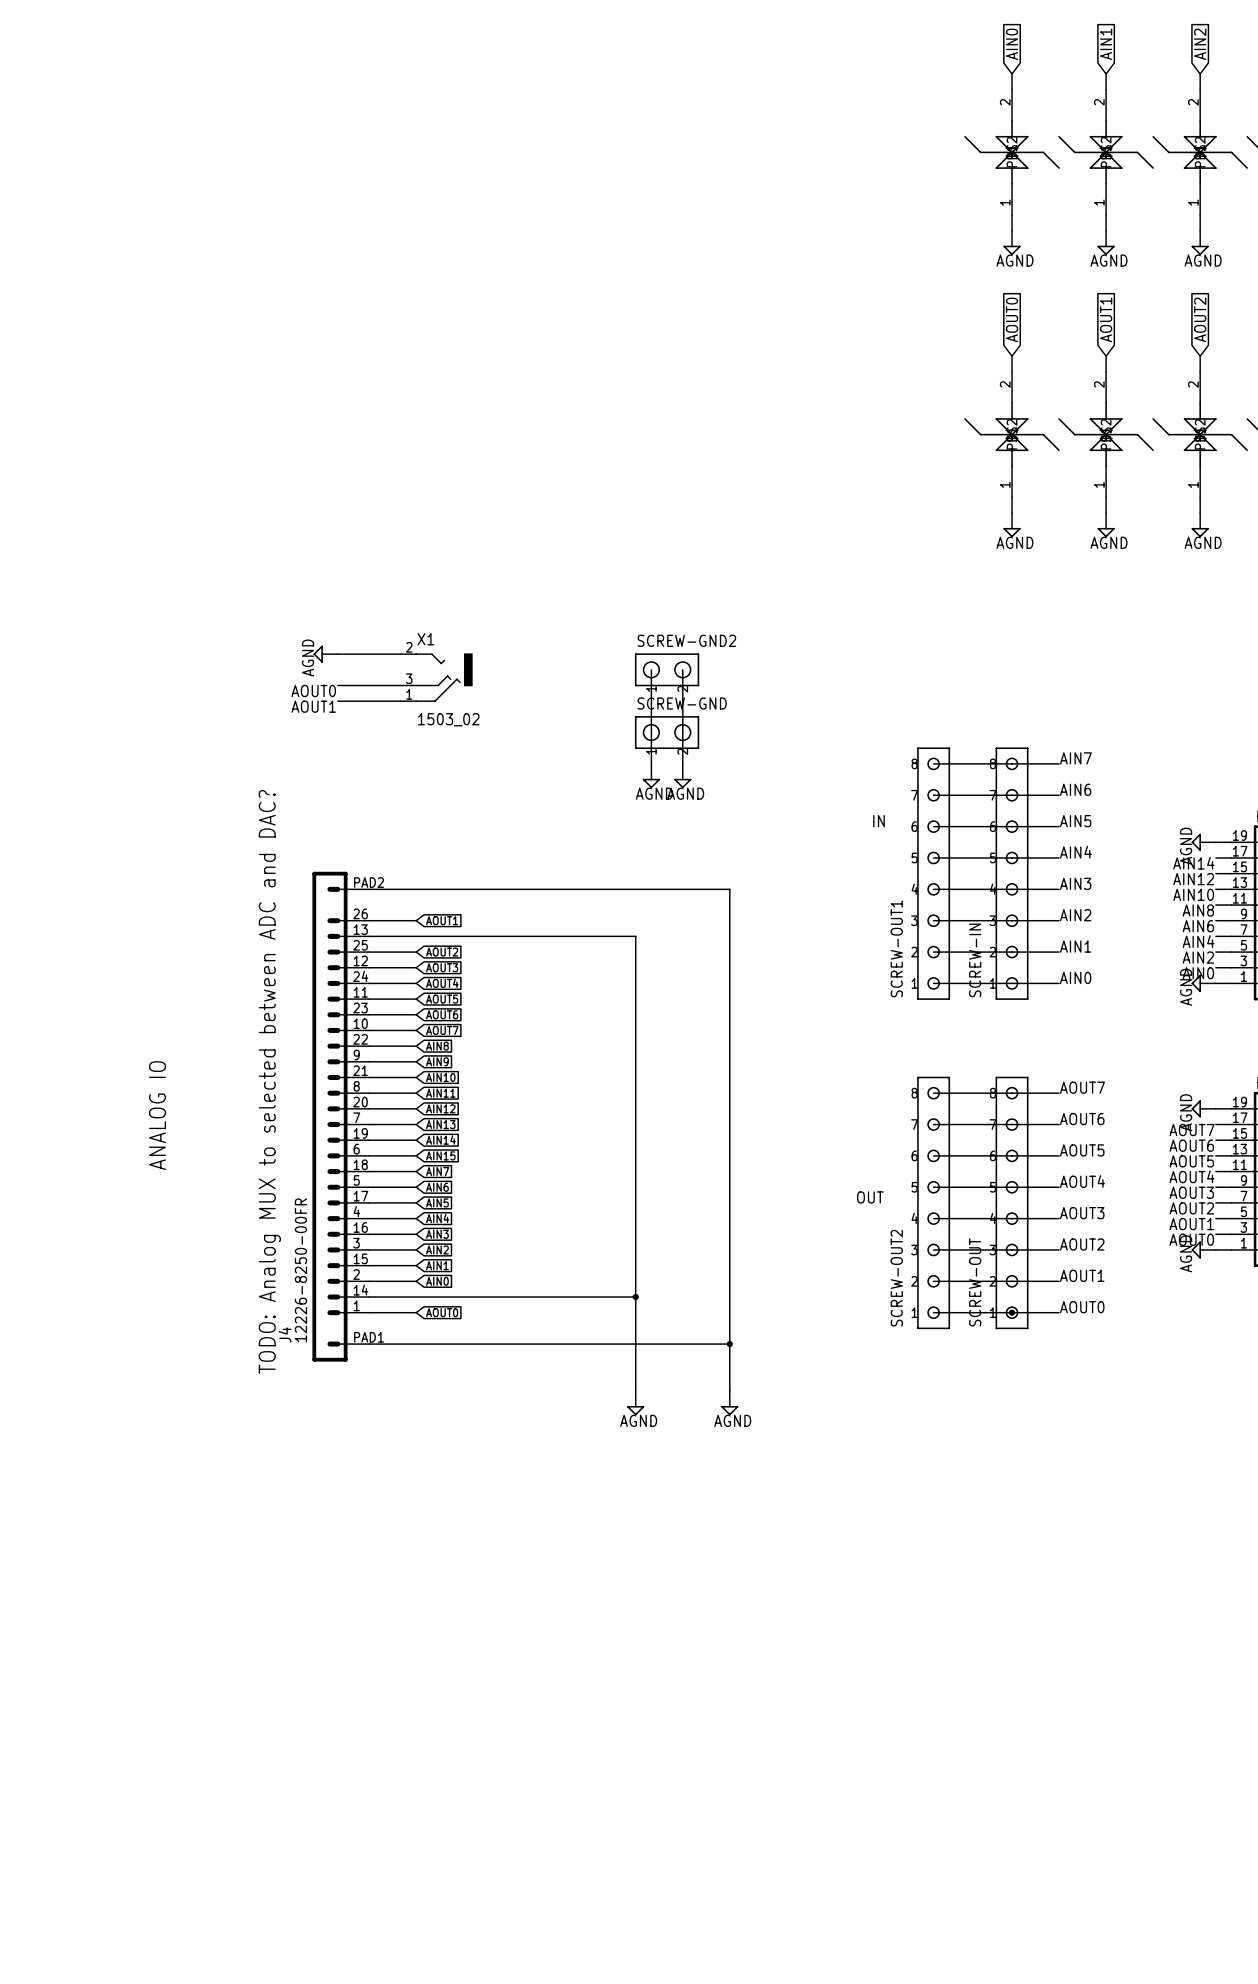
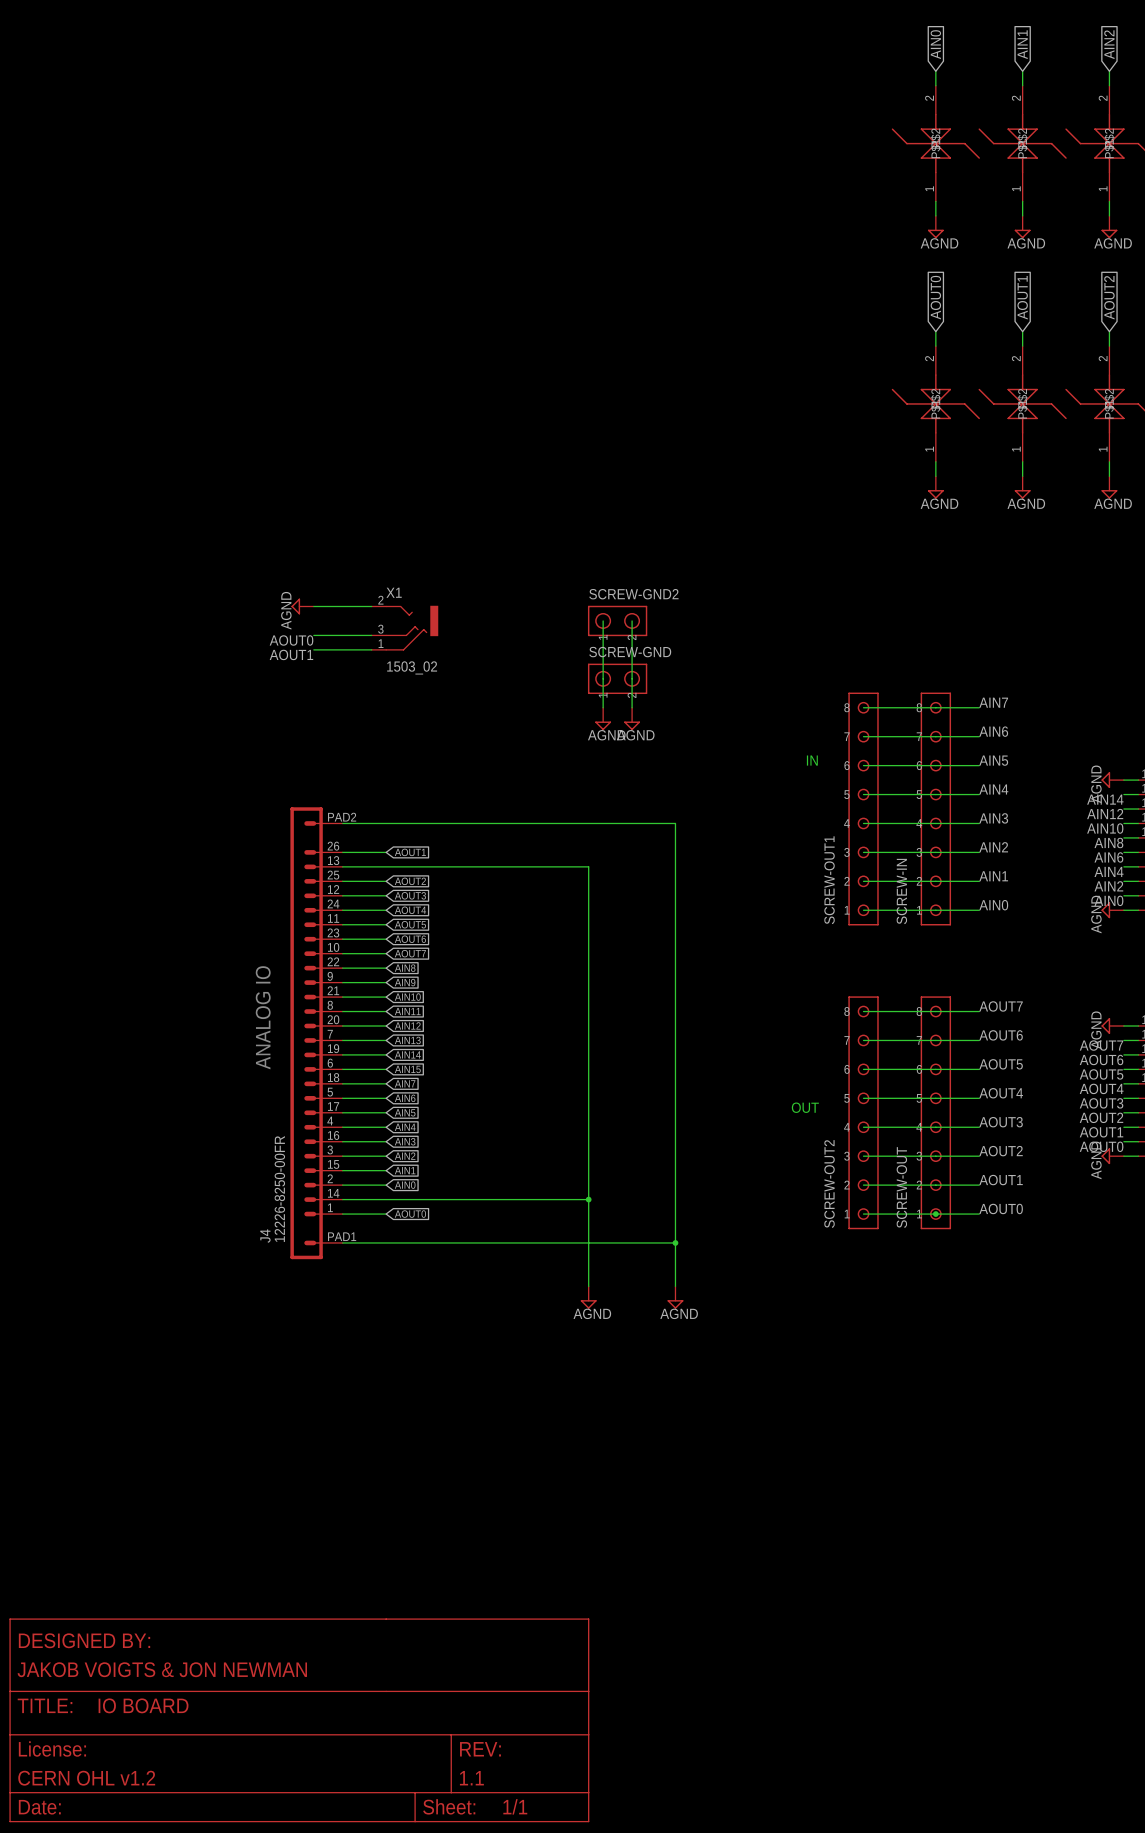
text: TODO: Analog MUX to selected between ADC and DAC? (269, 1081) -> none
text position: ANALOG IO (157, 1115) -> ANALOG IO (263, 1017)
part: none -> (299, 1720)

